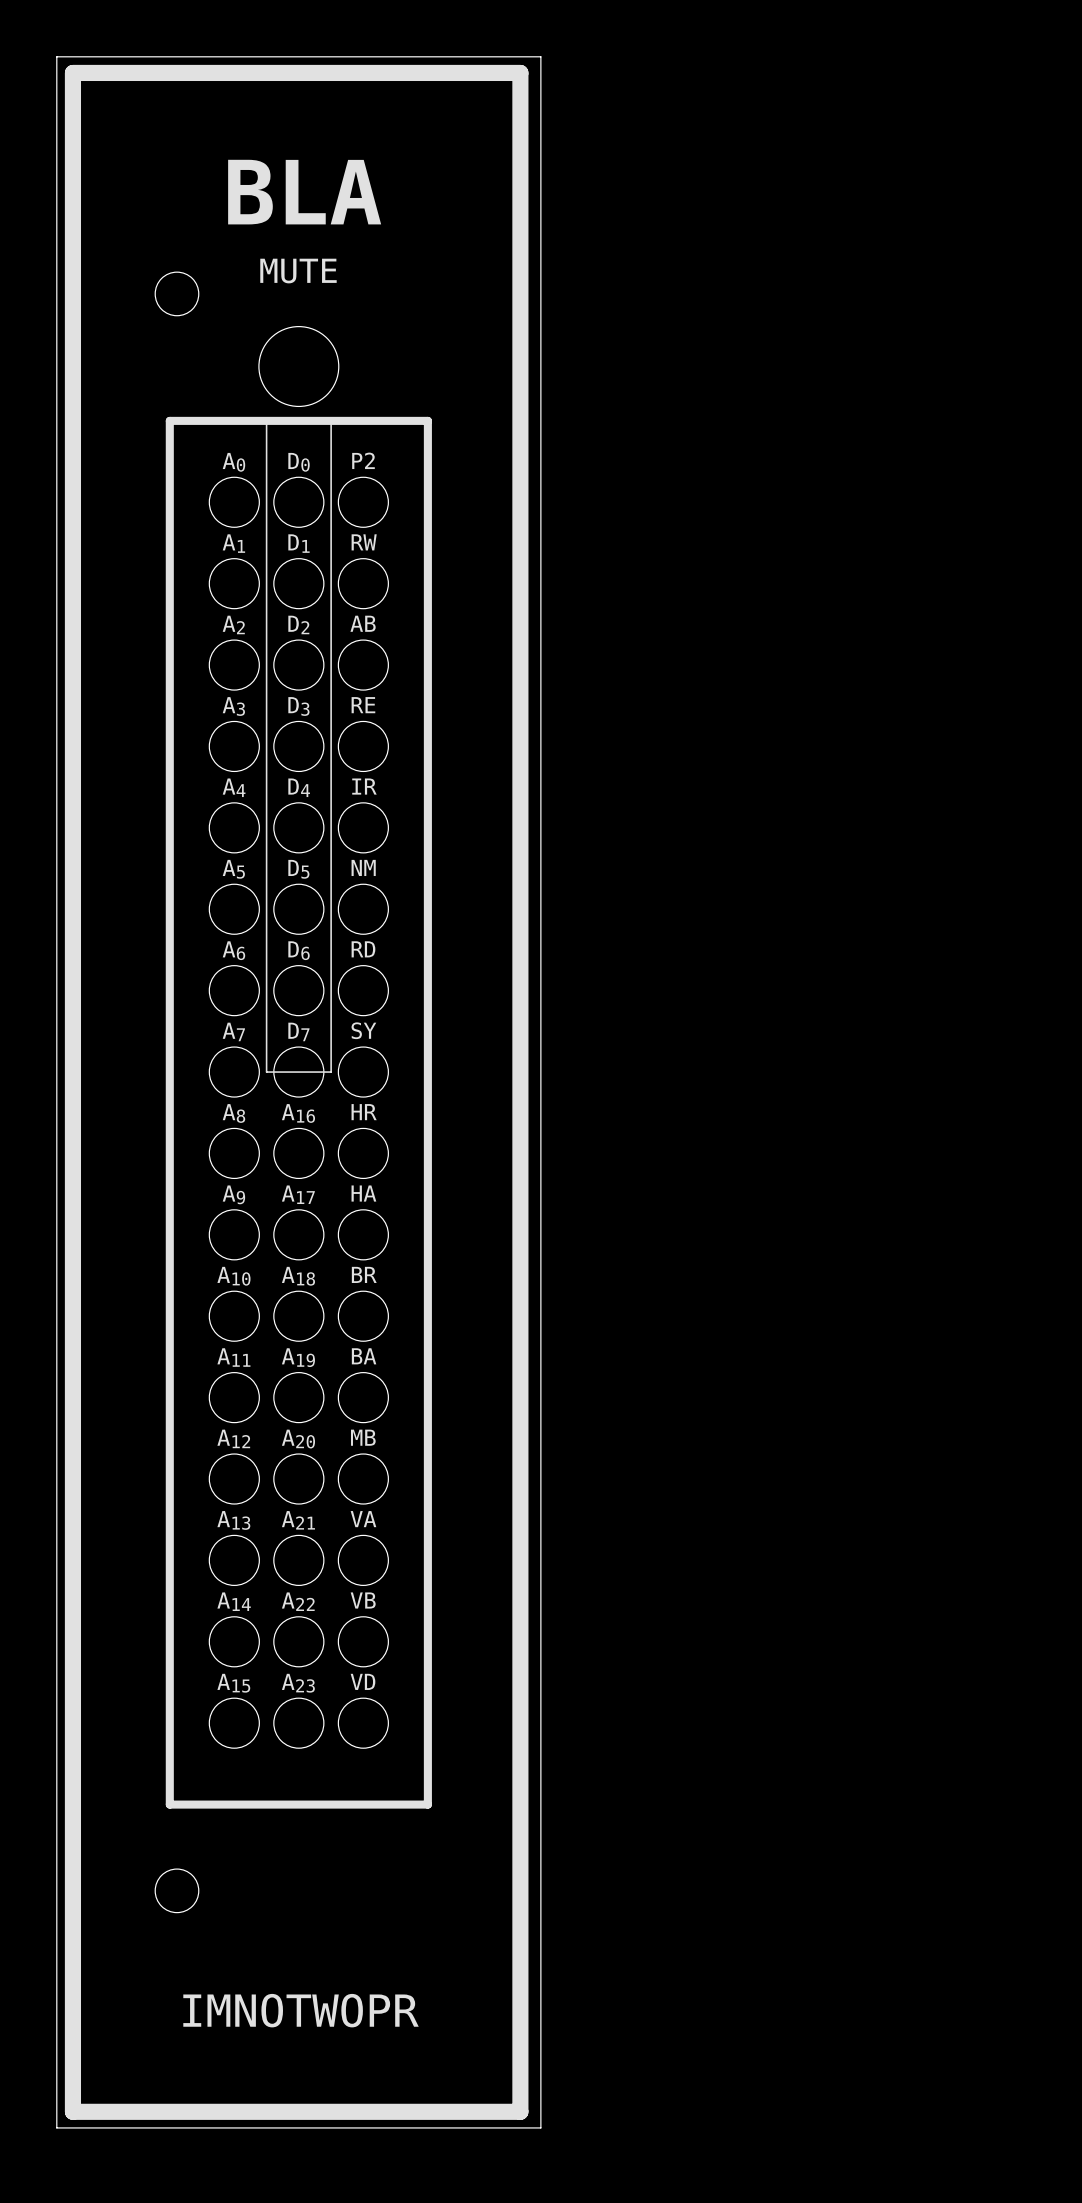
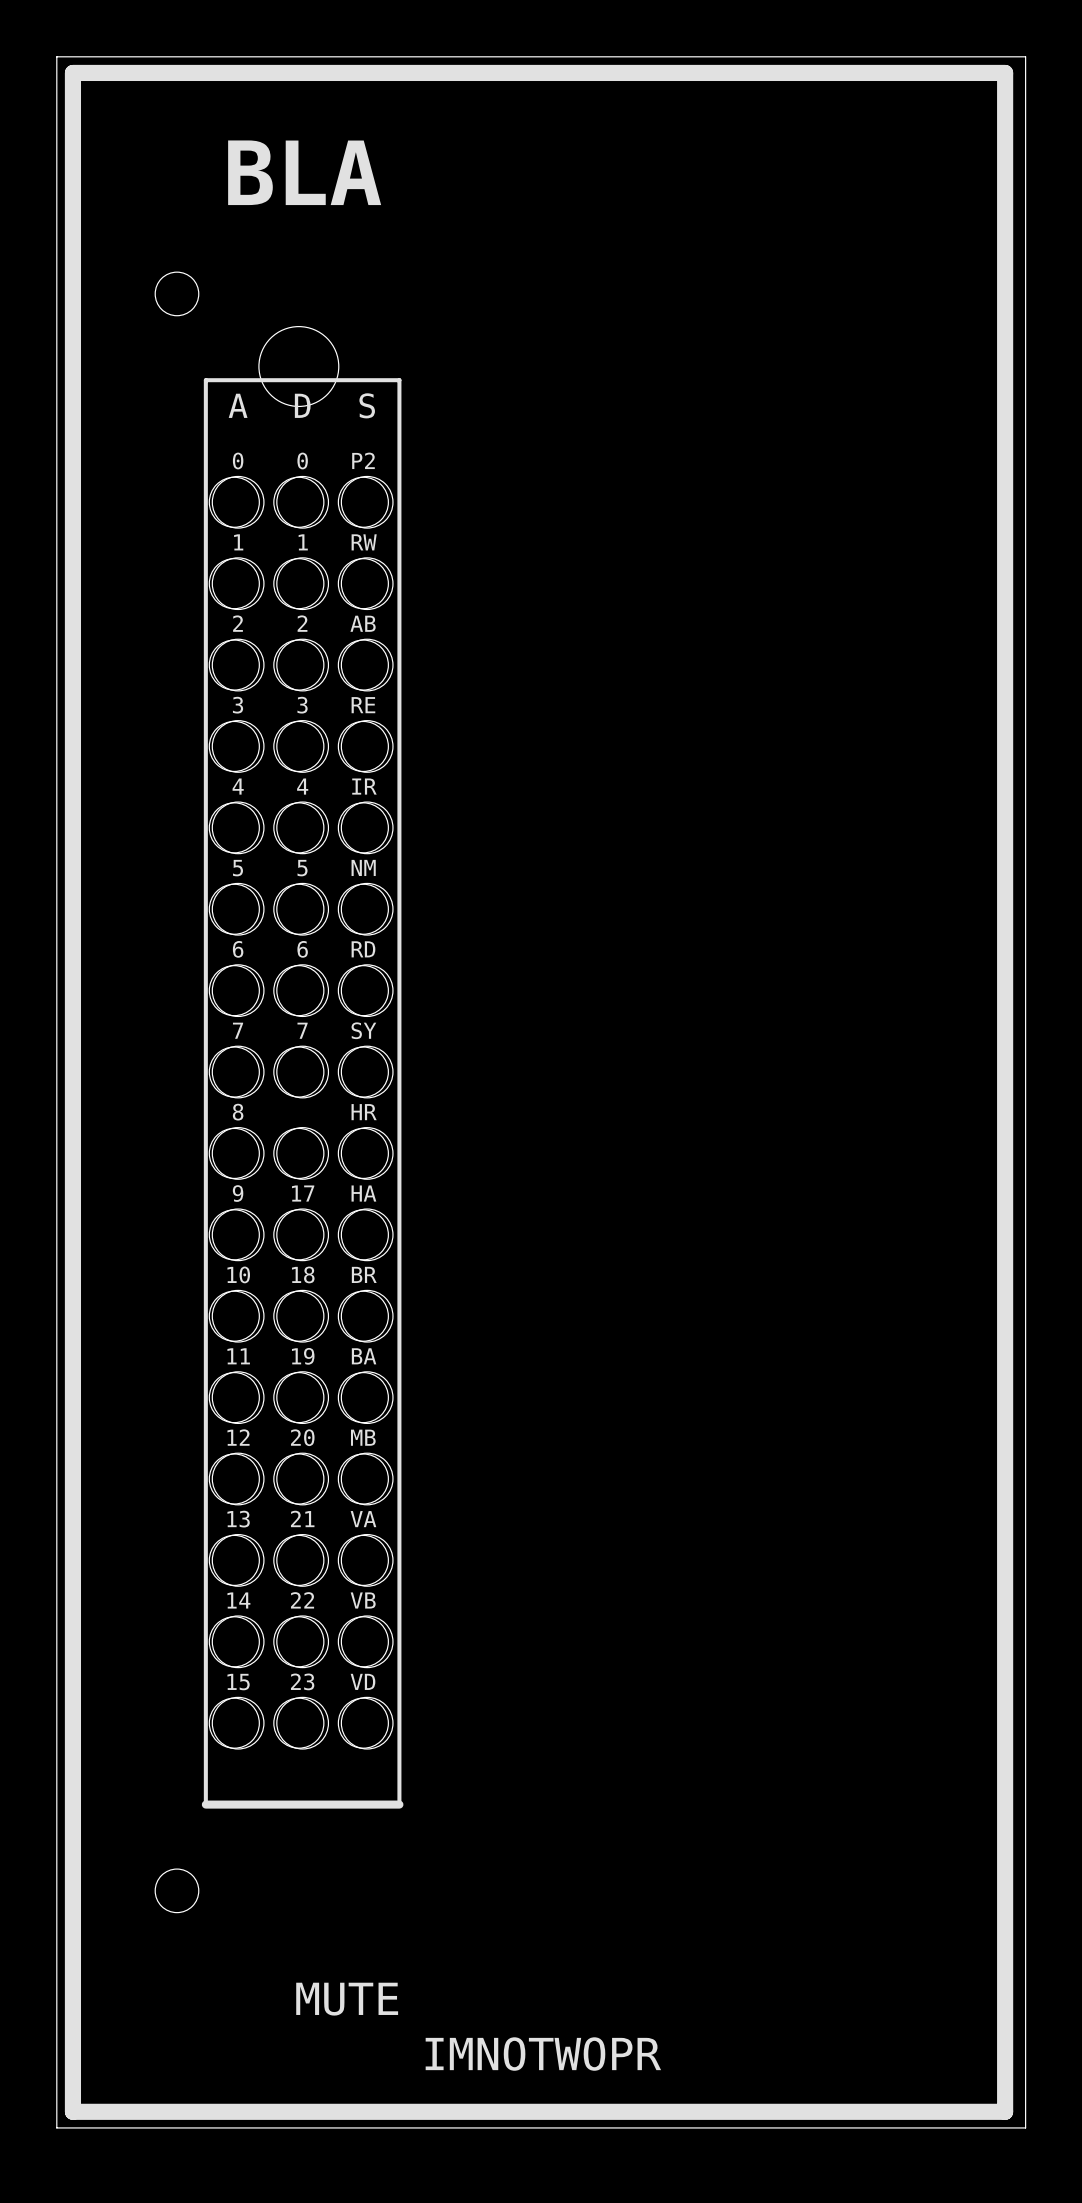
board edge: (540, 56) (540, 2127) -> (540, 56) (1025, 56) (1025, 2127) (540, 2127)
line: (520, 72) (520, 2111) -> (520, 72) (1005, 72) (1005, 2111) (520, 2111)
text position: BLA (304, 192) -> BLA (304, 172)
text: MUTE (298, 271) -> none
text: none -> A (238, 405)
text: none -> D (302, 405)
text: none -> S (367, 405)
line: (266, 420) (331, 420) (331, 1072) (266, 1072) (266, 420) -> none
text: A0 (233, 462) -> 0 (238, 460)
text: D0 (299, 462) -> 0 (302, 460)
round board edge: none -> [211, 476, 265, 529]
round board edge: none -> [276, 476, 329, 529]
round board edge: none -> [340, 476, 394, 529]
text: A1 (233, 543) -> 1 (238, 542)
text: D1 (298, 543) -> 1 (303, 542)
round board edge: none -> [211, 557, 265, 610]
round board edge: none -> [276, 557, 329, 610]
round board edge: none -> [340, 557, 394, 610]
text: A2 (233, 624) -> 2 (238, 623)
text: D2 (298, 624) -> 2 (302, 623)
round board edge: none -> [211, 638, 265, 692]
round board edge: none -> [276, 638, 329, 692]
round board edge: none -> [340, 638, 394, 692]
text: A3 (233, 706) -> 3 (238, 705)
text: D3 (298, 706) -> 3 (302, 705)
round board edge: none -> [211, 720, 265, 773]
round board edge: none -> [276, 720, 329, 773]
round board edge: none -> [340, 720, 394, 773]
text: A4 (234, 787) -> 4 (238, 786)
text: D4 (299, 787) -> 4 (302, 786)
round board edge: none -> [211, 801, 265, 855]
round board edge: none -> [276, 801, 329, 855]
round board edge: none -> [340, 801, 394, 855]
text: A5 (233, 869) -> 5 (238, 868)
text: D5 (298, 869) -> 5 (302, 868)
round board edge: none -> [211, 883, 265, 936]
round board edge: none -> [276, 883, 329, 936]
round board edge: none -> [340, 883, 394, 936]
text: A6 (233, 950) -> 6 (238, 949)
text: D6 (299, 950) -> 6 (302, 949)
round board edge: none -> [211, 964, 265, 1017]
round board edge: none -> [276, 964, 329, 1017]
round board edge: none -> [340, 964, 394, 1017]
text: A7 (233, 1031) -> 7 (238, 1030)
text: D7 (298, 1031) -> 7 (302, 1030)
round board edge: none -> [211, 1045, 265, 1099]
round board edge: none -> [276, 1045, 329, 1099]
round board edge: none -> [340, 1045, 394, 1099]
text: A8 (233, 1113) -> 8 (238, 1112)
text: A16 (298, 1113) -> none
round board edge: none -> [211, 1127, 265, 1180]
round board edge: none -> [276, 1127, 329, 1180]
round board edge: none -> [340, 1127, 394, 1180]
text: A9 (233, 1194) -> 9 (238, 1193)
text: A17 (298, 1194) -> 17 (303, 1193)
round board edge: none -> [211, 1208, 265, 1262]
round board edge: none -> [276, 1208, 329, 1262]
round board edge: none -> [340, 1208, 394, 1262]
text: A10 (233, 1276) -> 10 (238, 1274)
text: A18 (298, 1276) -> 18 (303, 1274)
round board edge: none -> [211, 1290, 265, 1343]
round board edge: none -> [276, 1290, 329, 1343]
round board edge: none -> [340, 1290, 394, 1343]
text: A11 (233, 1357) -> 11 (238, 1356)
text: A19 (298, 1357) -> 19 (303, 1356)
round board edge: none -> [211, 1371, 265, 1424]
round board edge: none -> [276, 1371, 329, 1424]
round board edge: none -> [340, 1371, 394, 1424]
text: A12 (233, 1438) -> 12 (238, 1437)
text: A20 (298, 1439) -> 20 (302, 1437)
round board edge: none -> [211, 1452, 265, 1506]
round board edge: none -> [276, 1452, 329, 1506]
round board edge: none -> [340, 1452, 394, 1506]
text: A13 (233, 1520) -> 13 (238, 1519)
text: A21 (298, 1520) -> 21 (302, 1518)
round board edge: none -> [211, 1534, 265, 1587]
round board edge: none -> [276, 1534, 329, 1587]
round board edge: none -> [340, 1534, 394, 1587]
text: A14 (234, 1601) -> 14 (238, 1600)
text: A22 (298, 1601) -> 22 (302, 1600)
round board edge: none -> [211, 1615, 265, 1669]
round board edge: none -> [276, 1615, 329, 1669]
round board edge: none -> [340, 1615, 394, 1669]
text: A15 (233, 1683) -> 15 (238, 1682)
text: A23 (298, 1683) -> 23 (302, 1681)
round board edge: none -> [211, 1696, 265, 1750]
round board edge: none -> [276, 1696, 329, 1750]
round board edge: none -> [340, 1696, 394, 1750]
line: (205, 1804) (169, 1804) (169, 420) (427, 420) (427, 1804) (399, 1804) -> (205, 1804) (205, 380) (399, 380) (399, 1804)
text: none -> MUTE (347, 1999)
text position: IMNOTWOPR (301, 2010) -> IMNOTWOPR (543, 2054)

